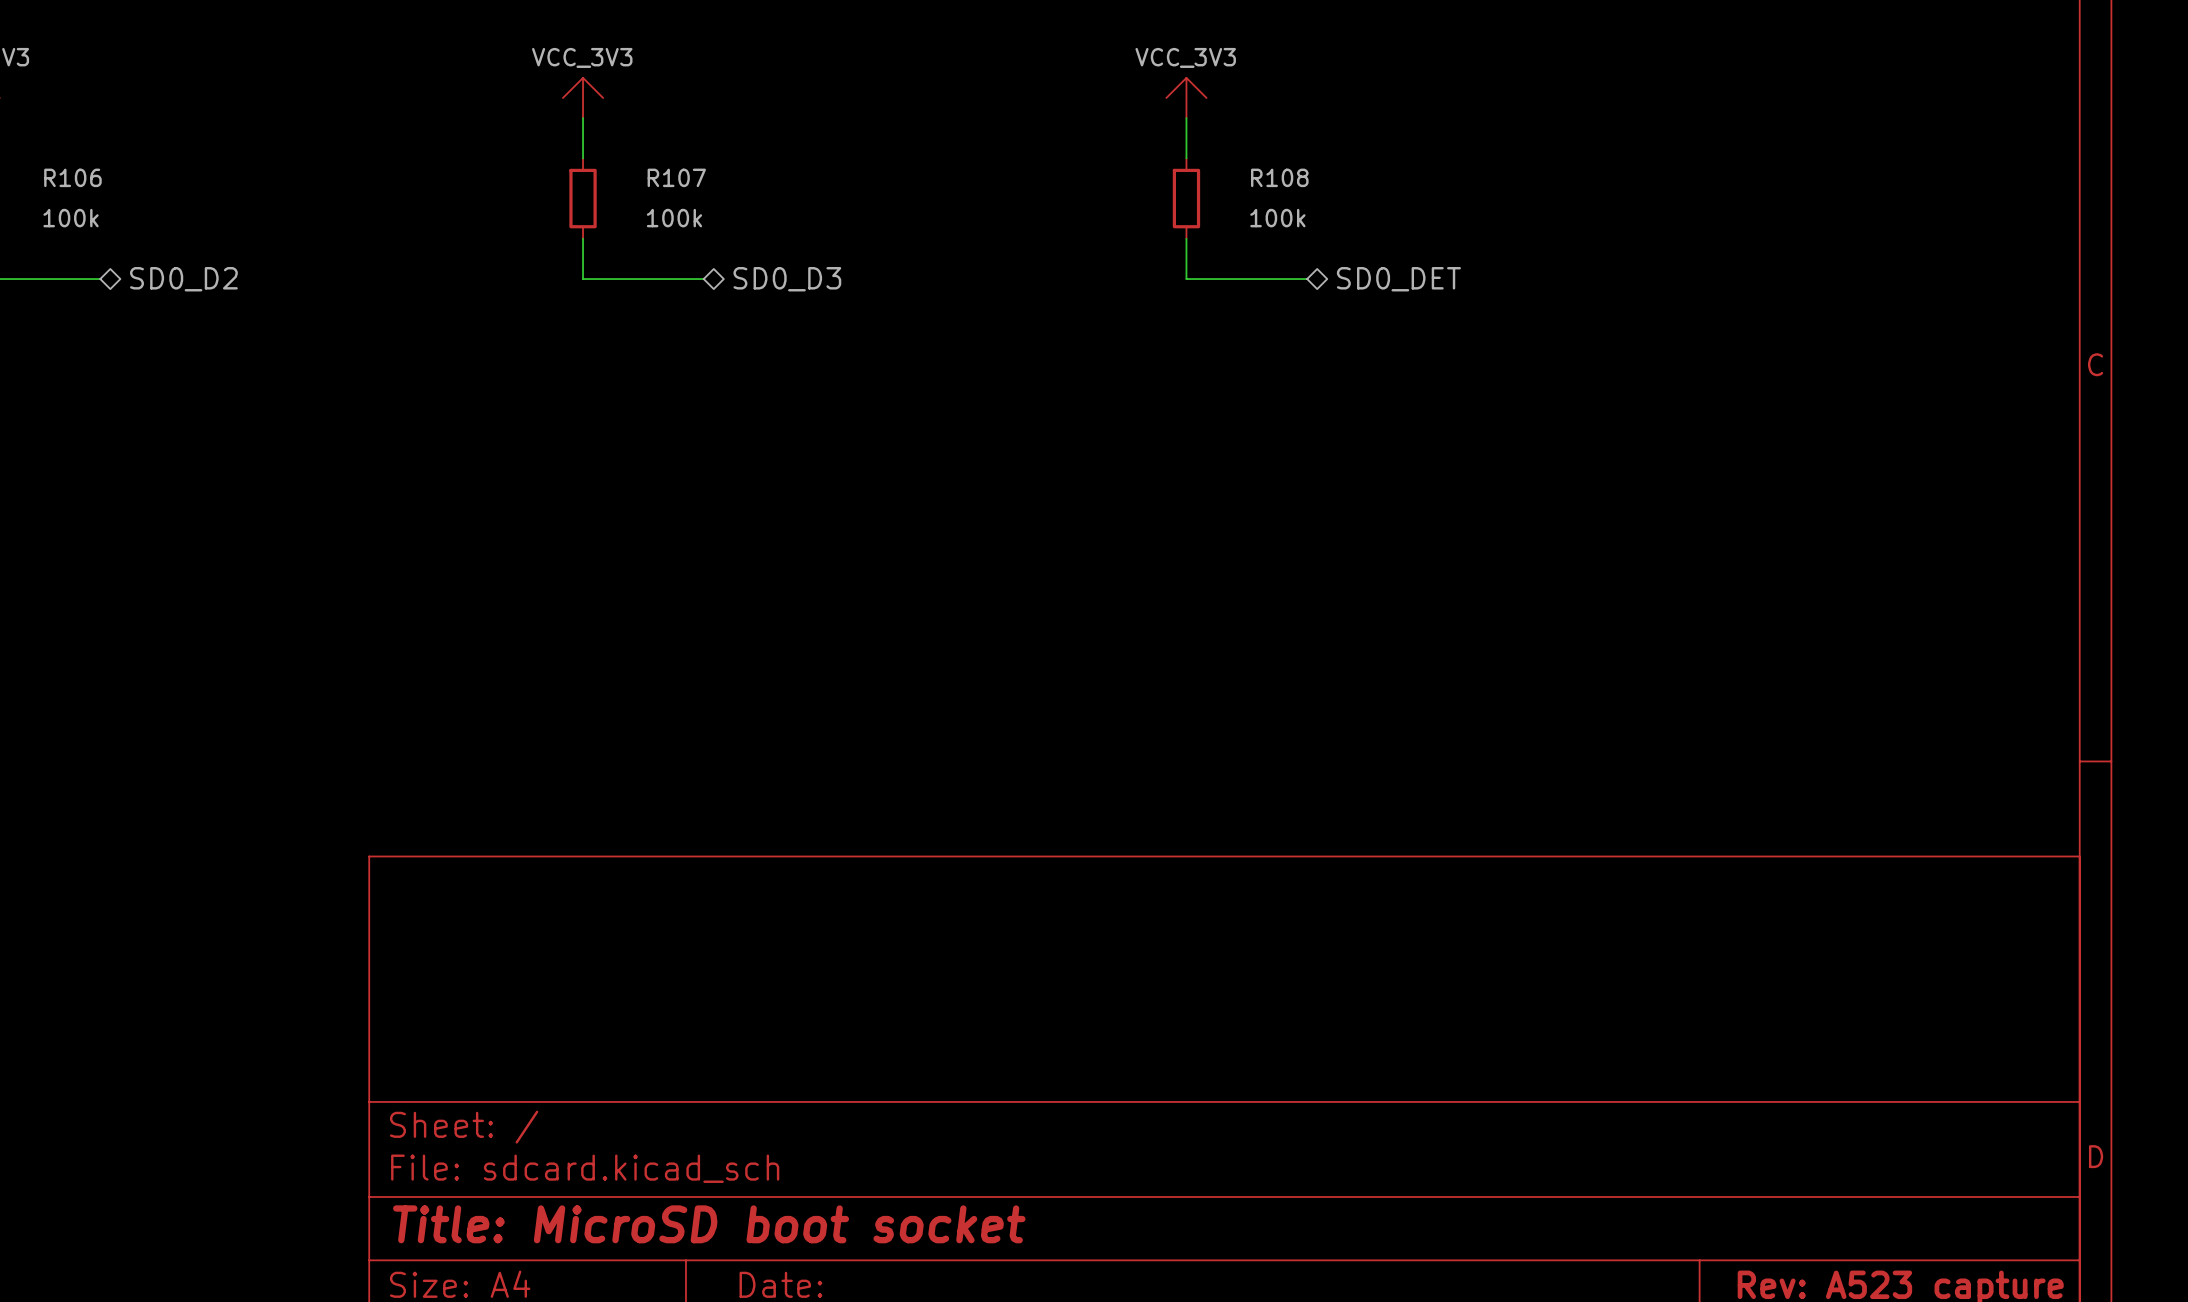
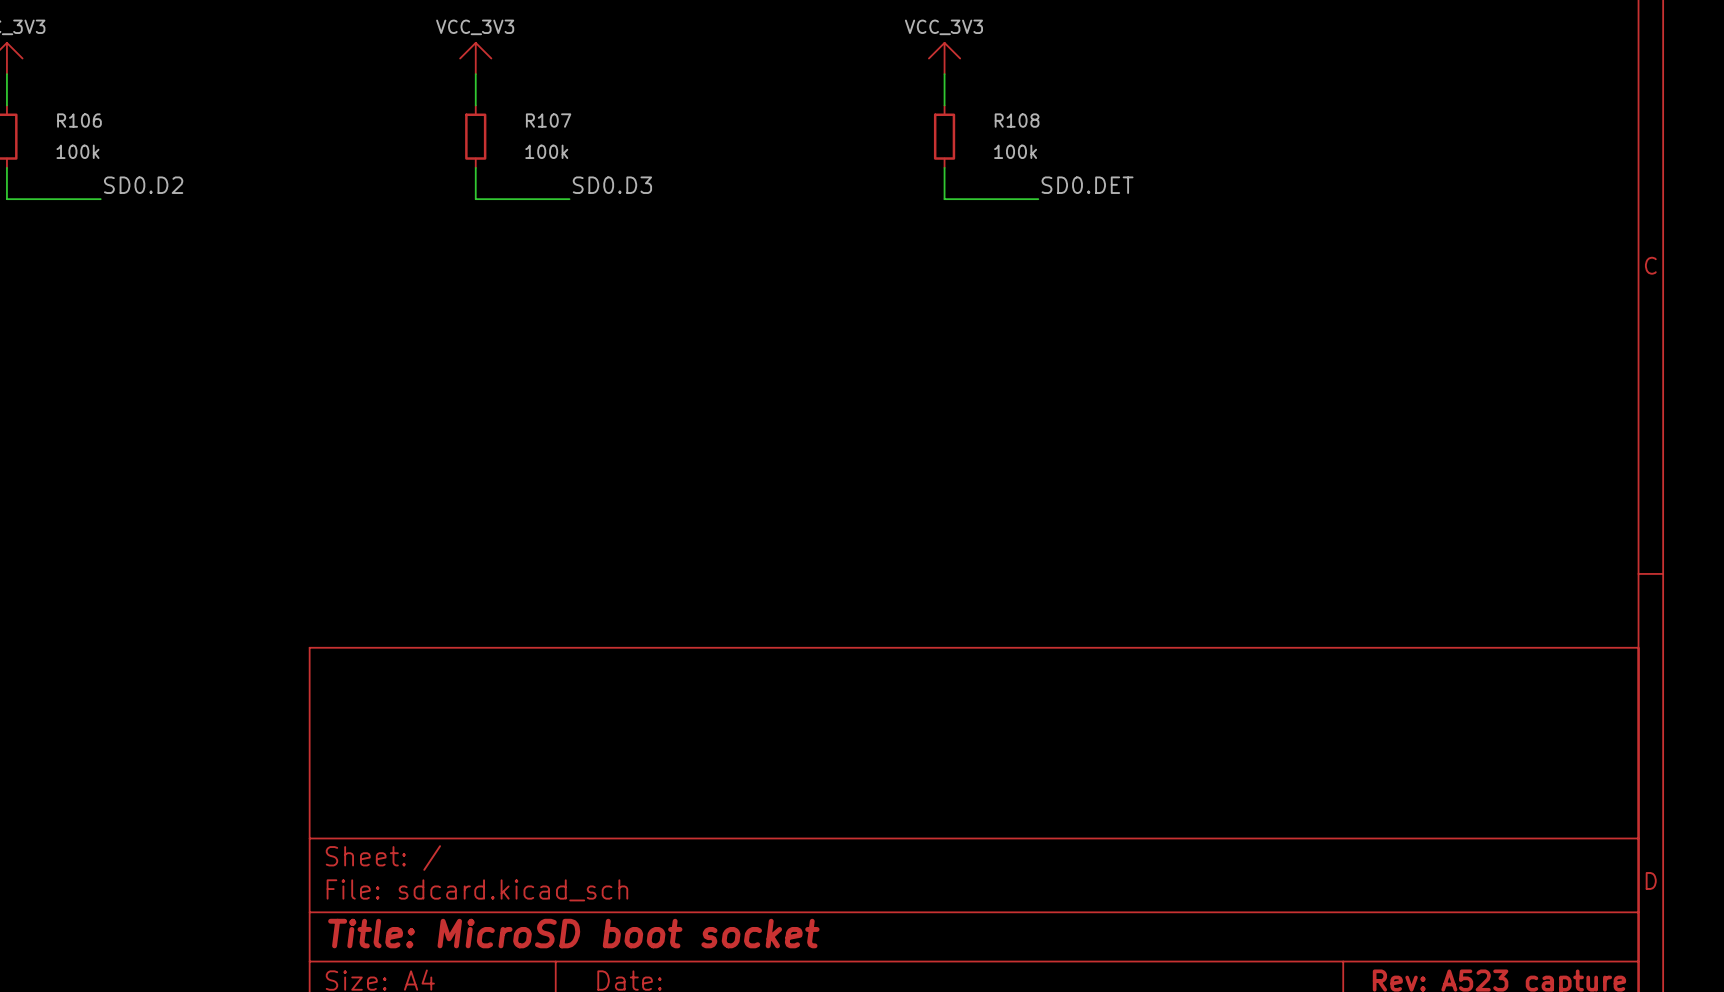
label: none -> SD0.D2 (143, 185)
label: none -> SD0.D3 (612, 185)
label: none -> SD0.DET (1087, 185)
hierarchical label: SD0_D2 (183, 279) -> none
hierarchical label: SD0_D3 (787, 279) -> none
hierarchical label: SD0_DET (1398, 279) -> none

